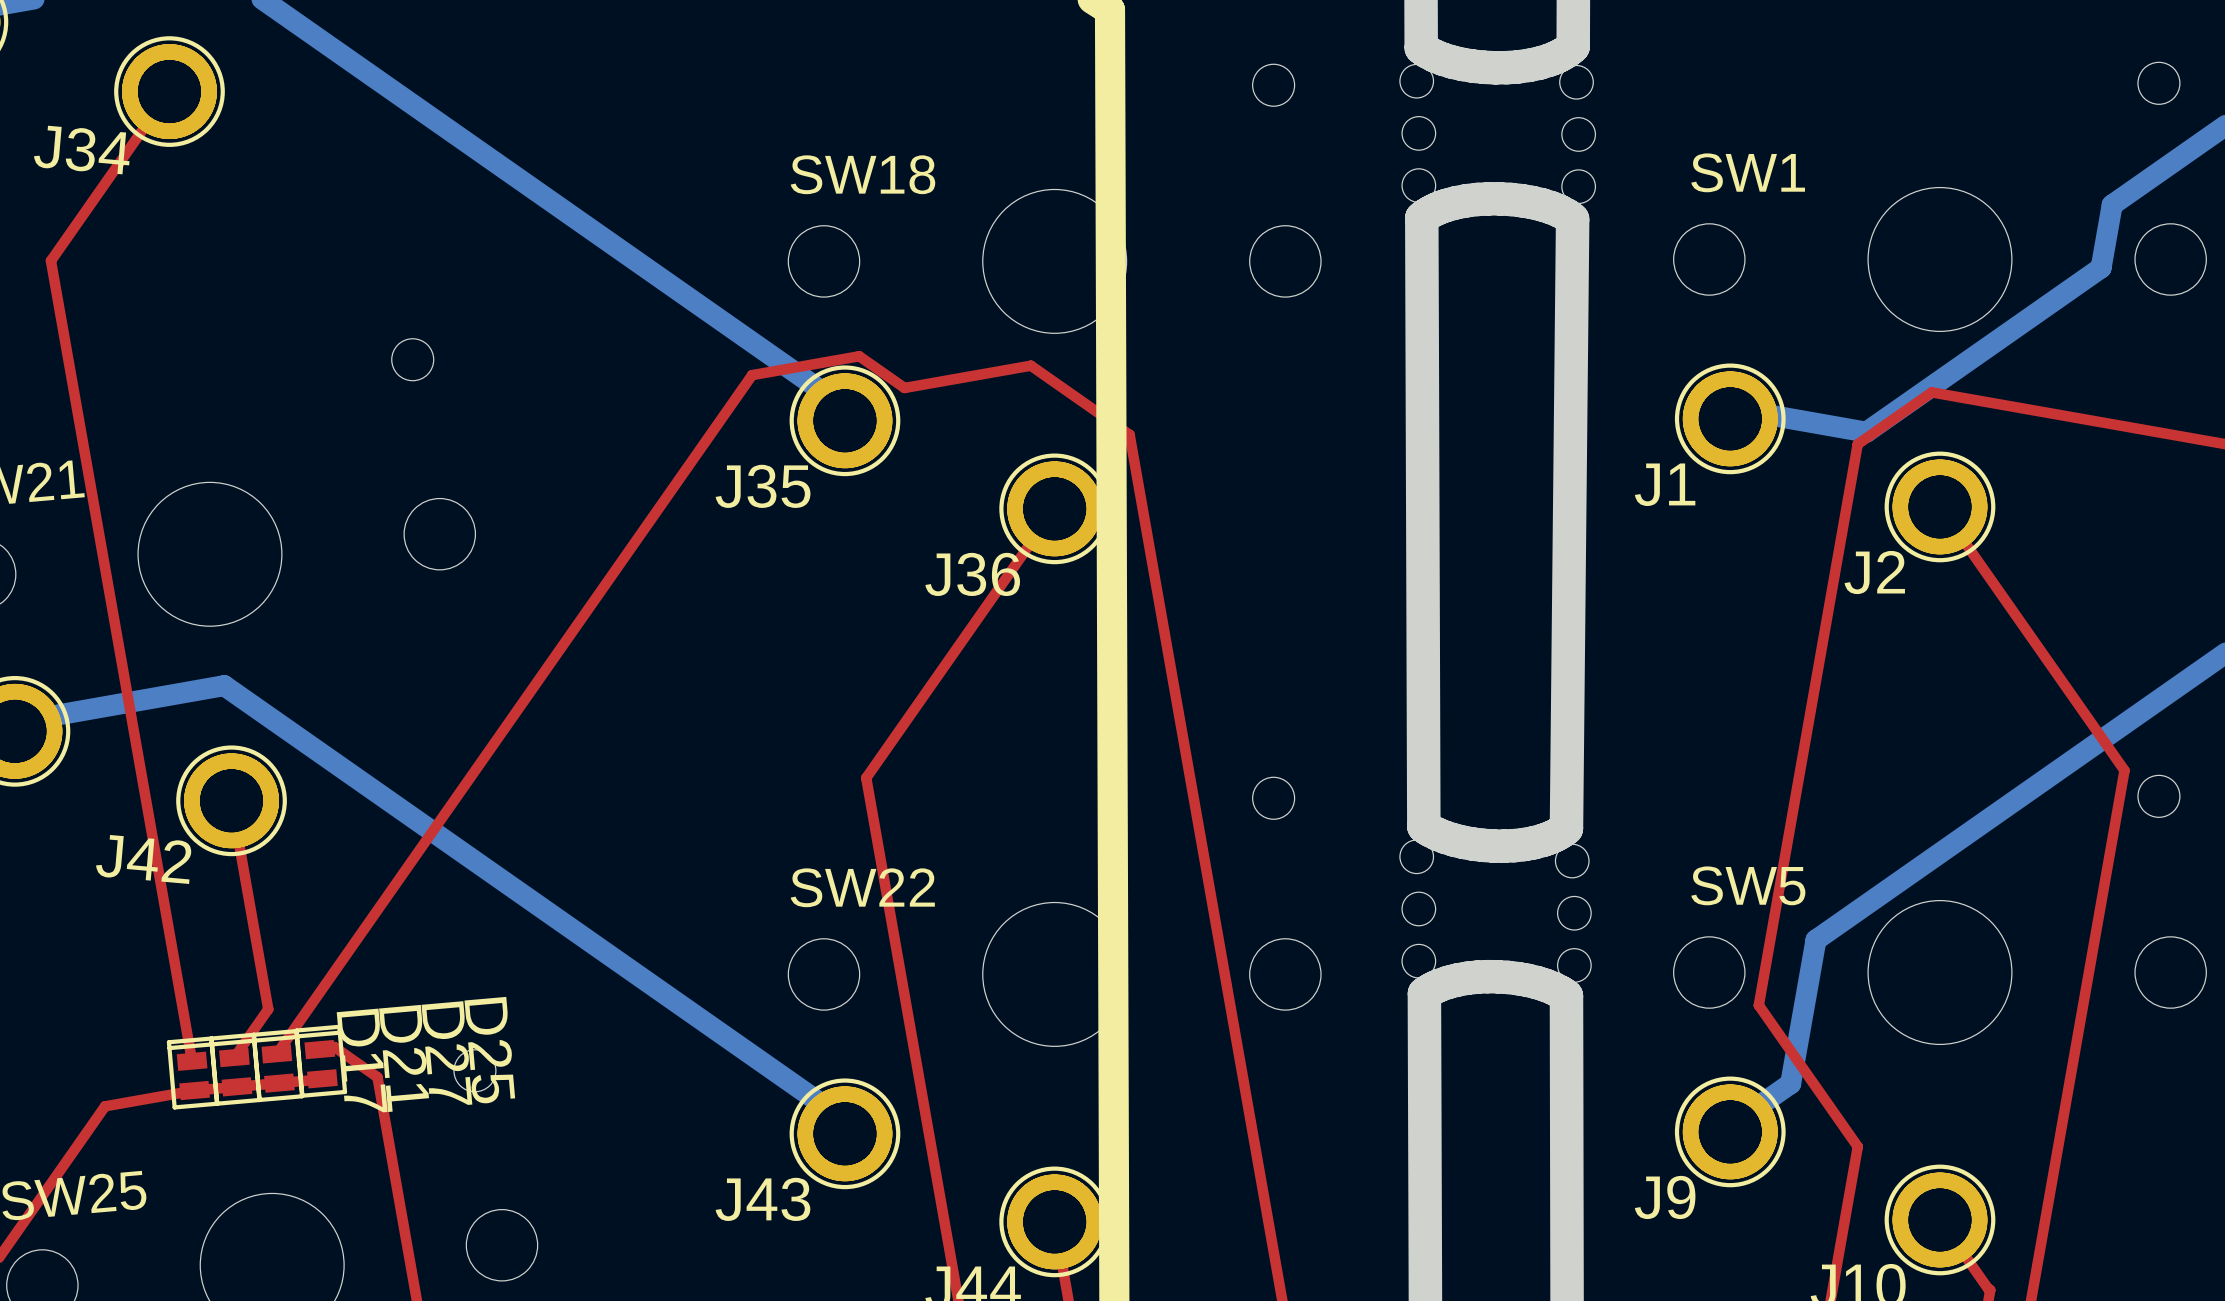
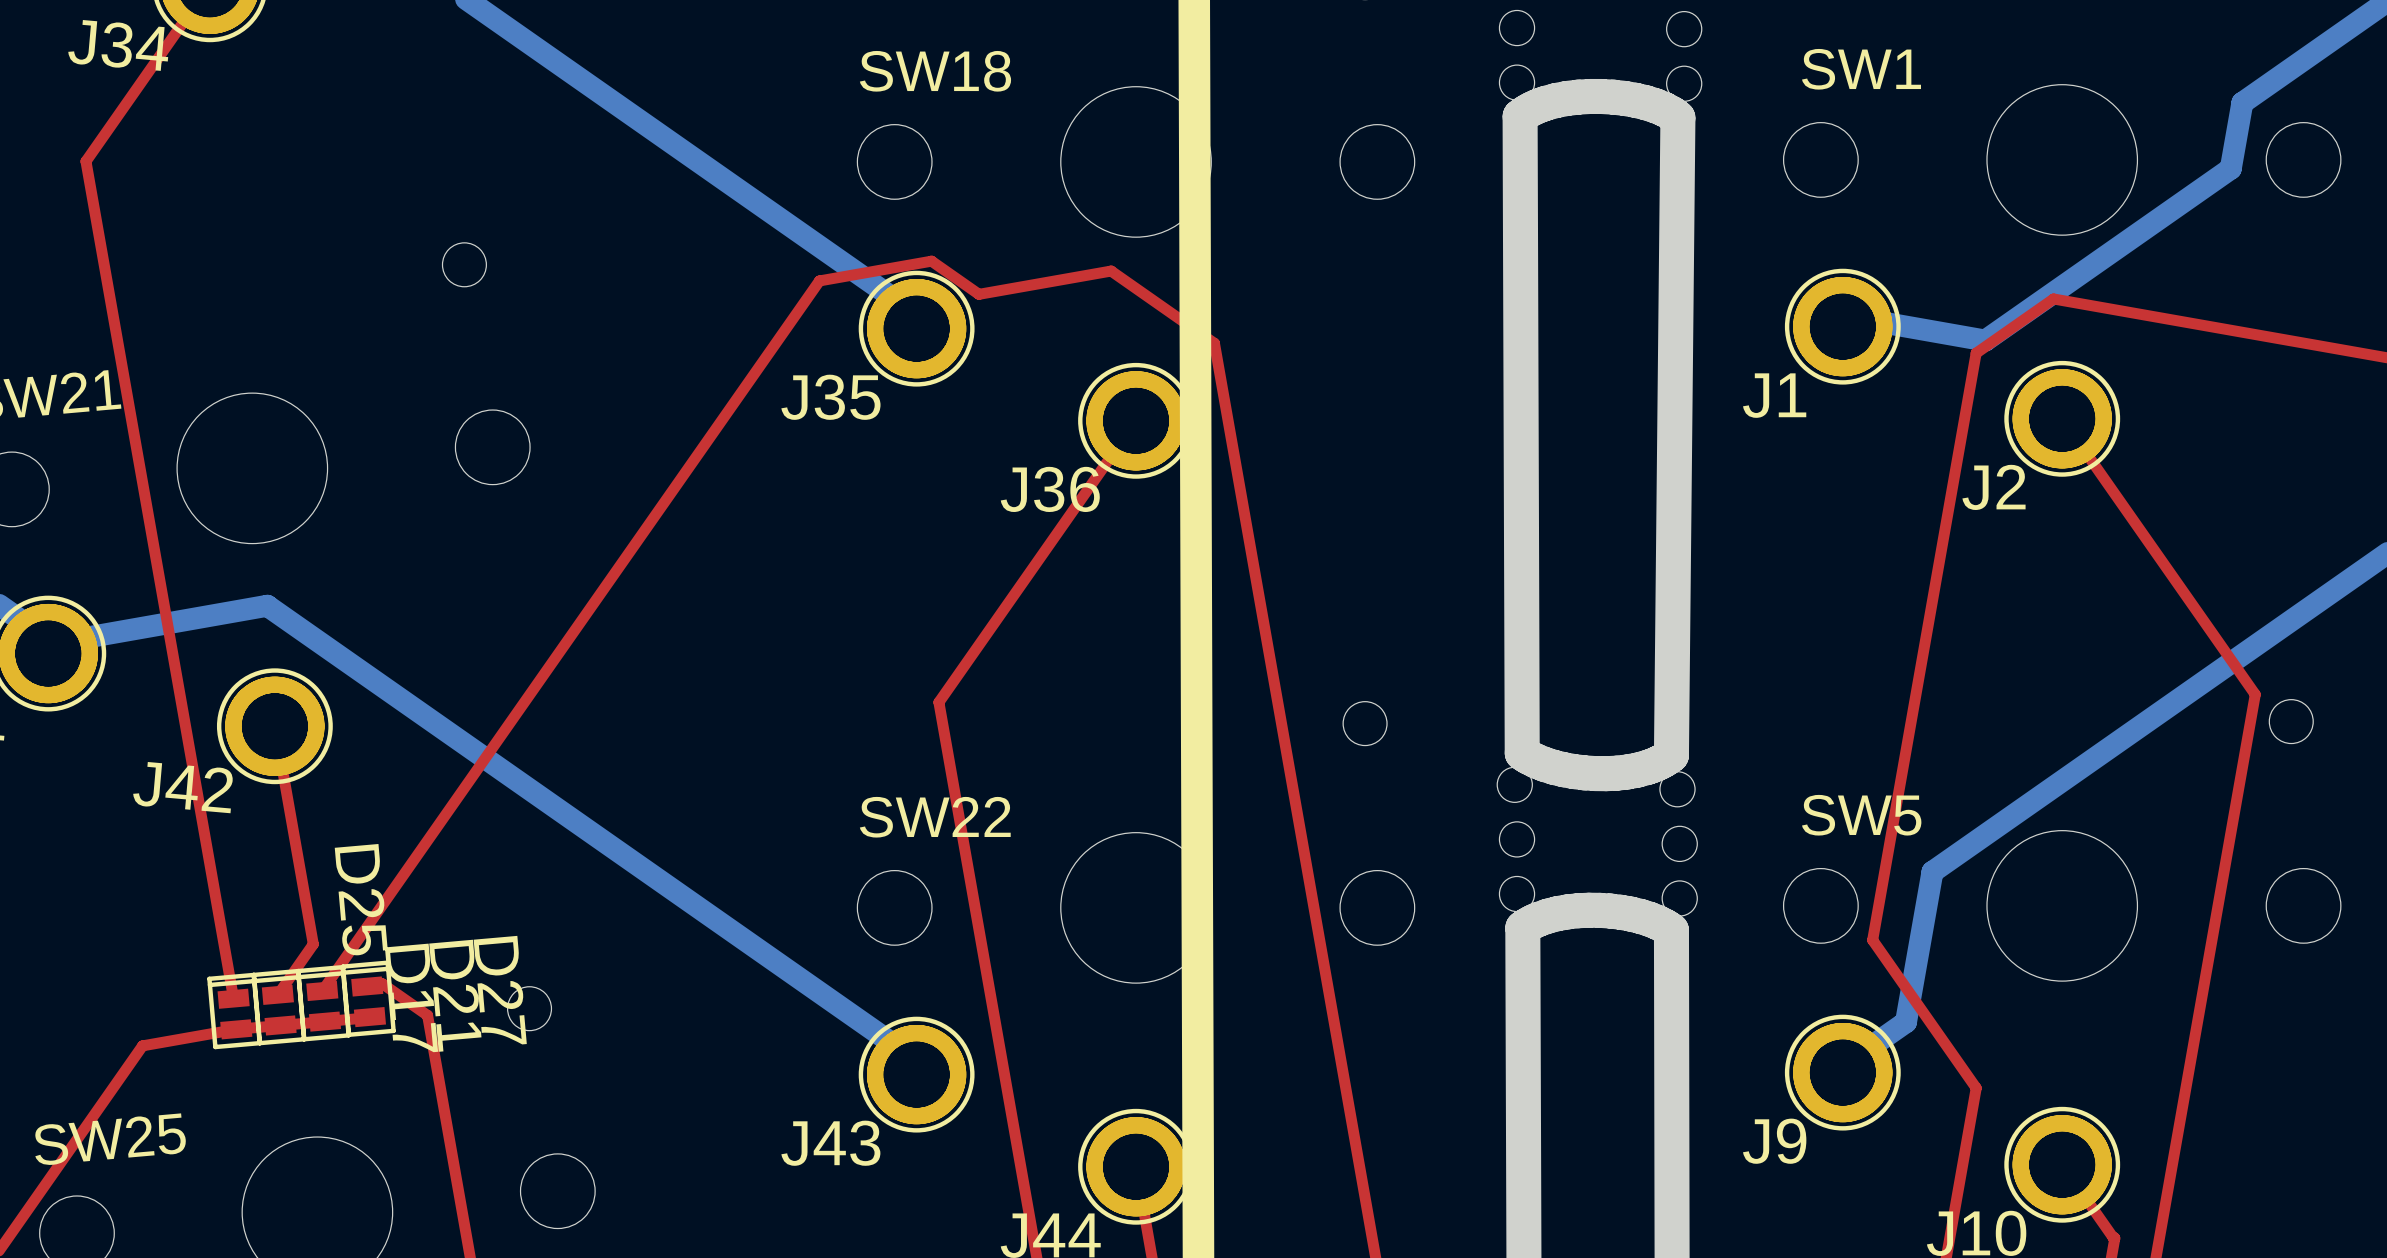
D25 name position: D25 (489, 1050) -> D25 (361, 899)

